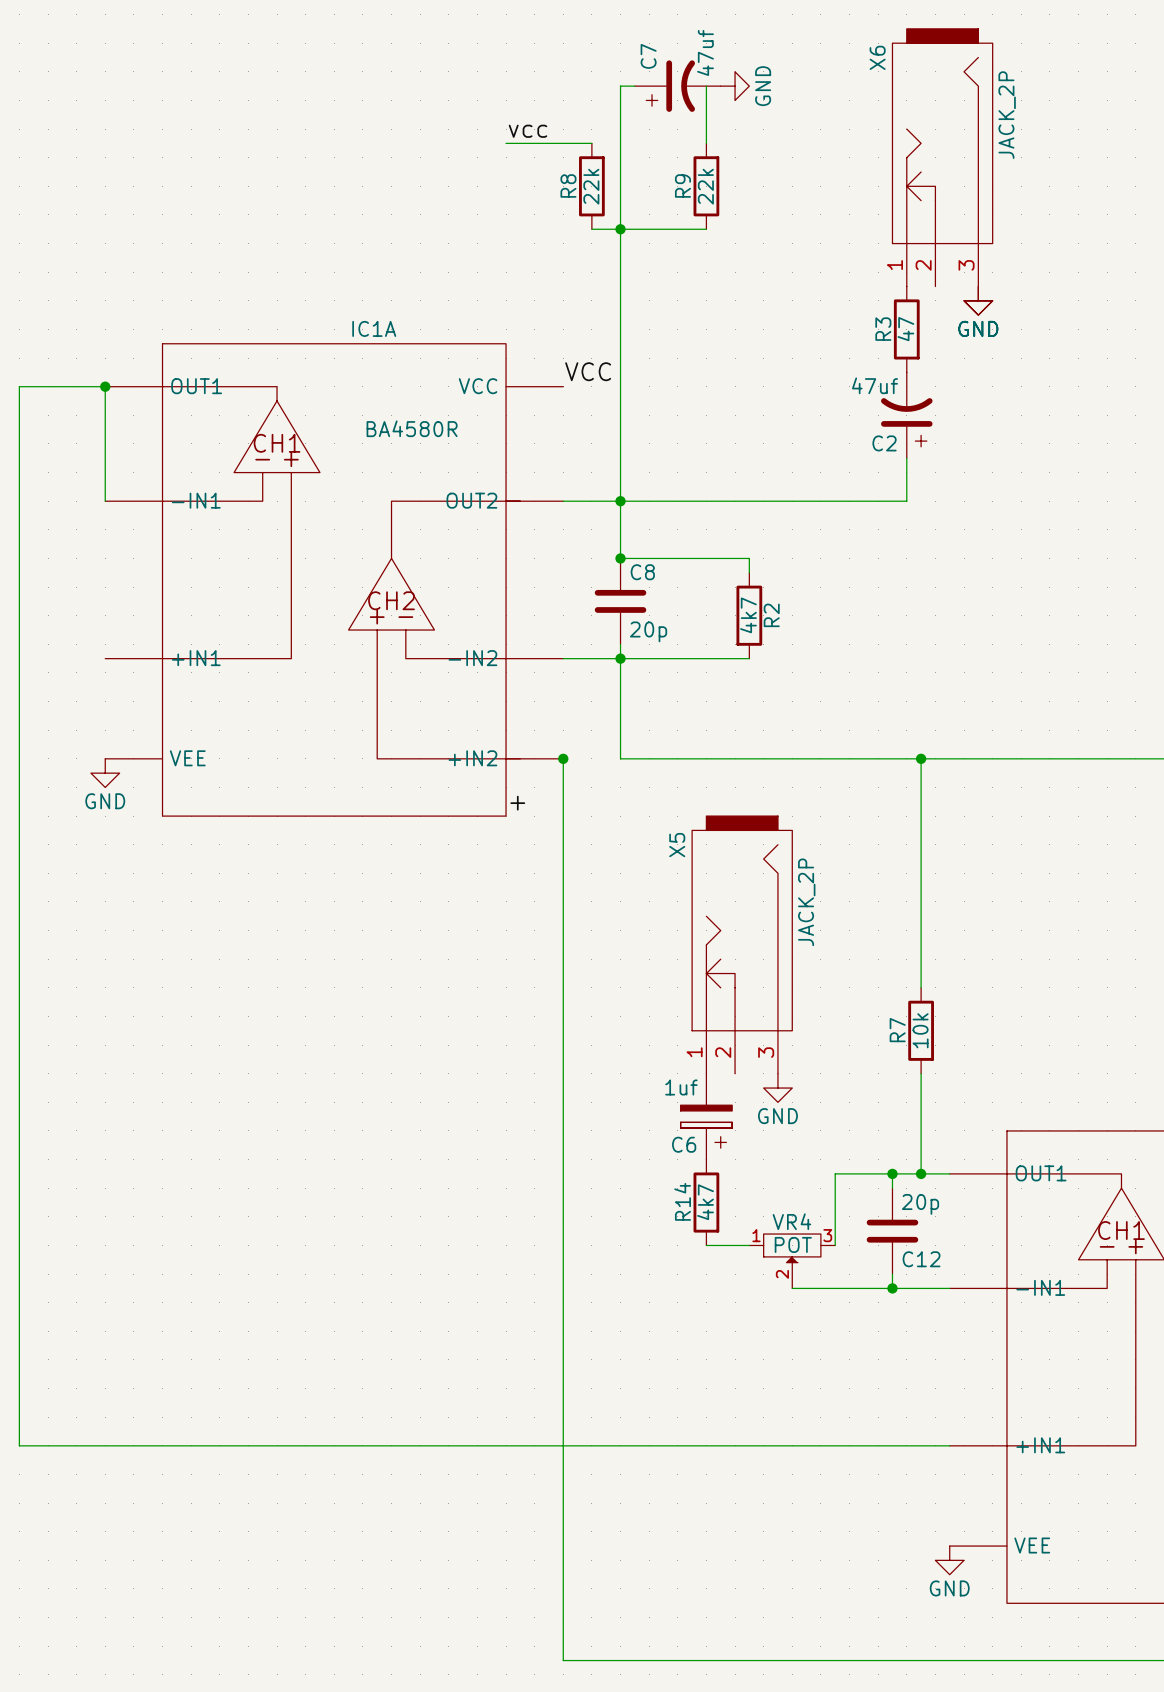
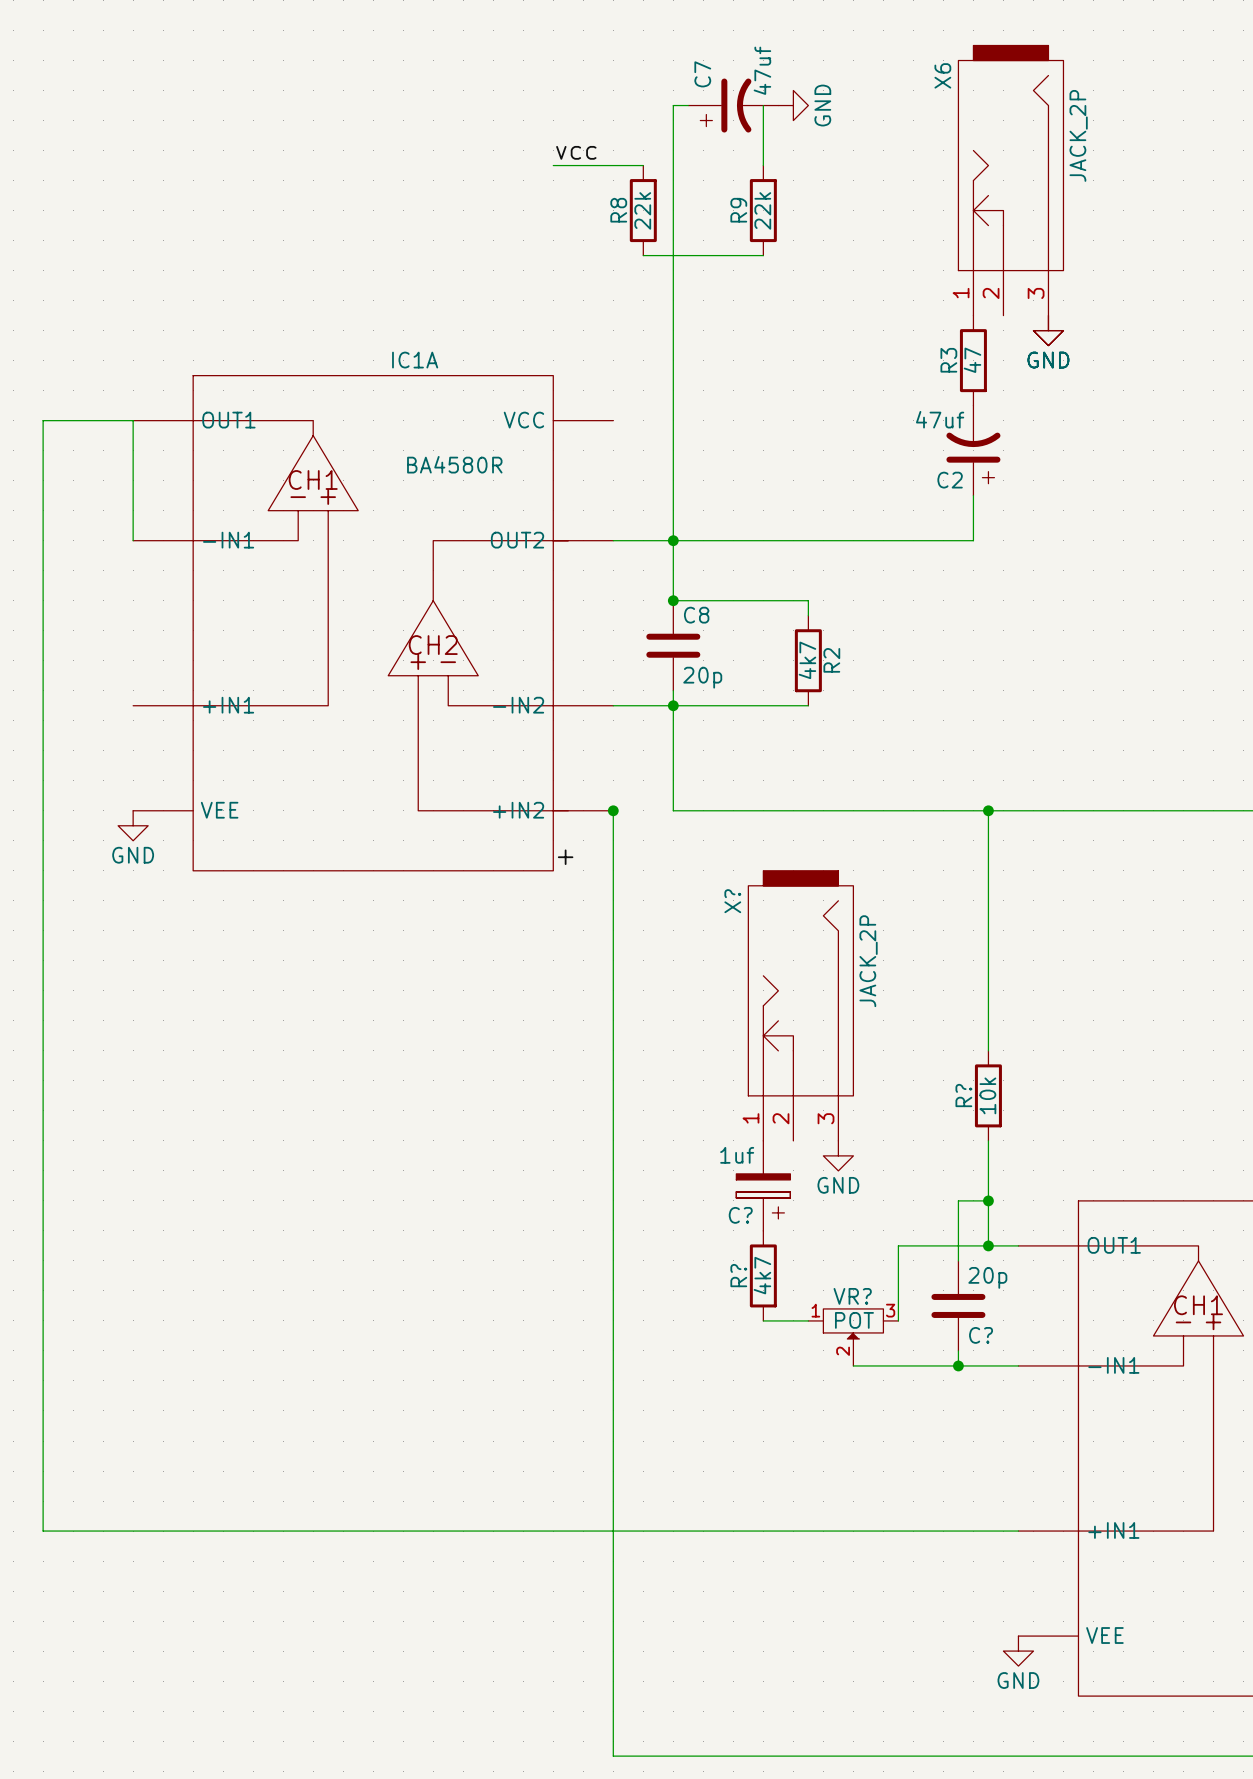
junction: (620, 229) -> none
label: VCC (588, 371) -> none
junction: (105, 386) -> none
X5 name: X5 (677, 845) -> X? (732, 901)
R7 name: R7 (897, 1030) -> R? (963, 1095)
wire: none -> (988, 1200) (958, 1200) (958, 1245)
C6 name: C6 (684, 1144) -> C? (740, 1215)
junction position: (892, 1173) -> (988, 1200)
R14 name: R14 (682, 1201) -> R? (738, 1275)
VR4 name: VR4 (791, 1221) -> VR? (852, 1296)
C12 name: C12 (921, 1259) -> C? (981, 1335)

